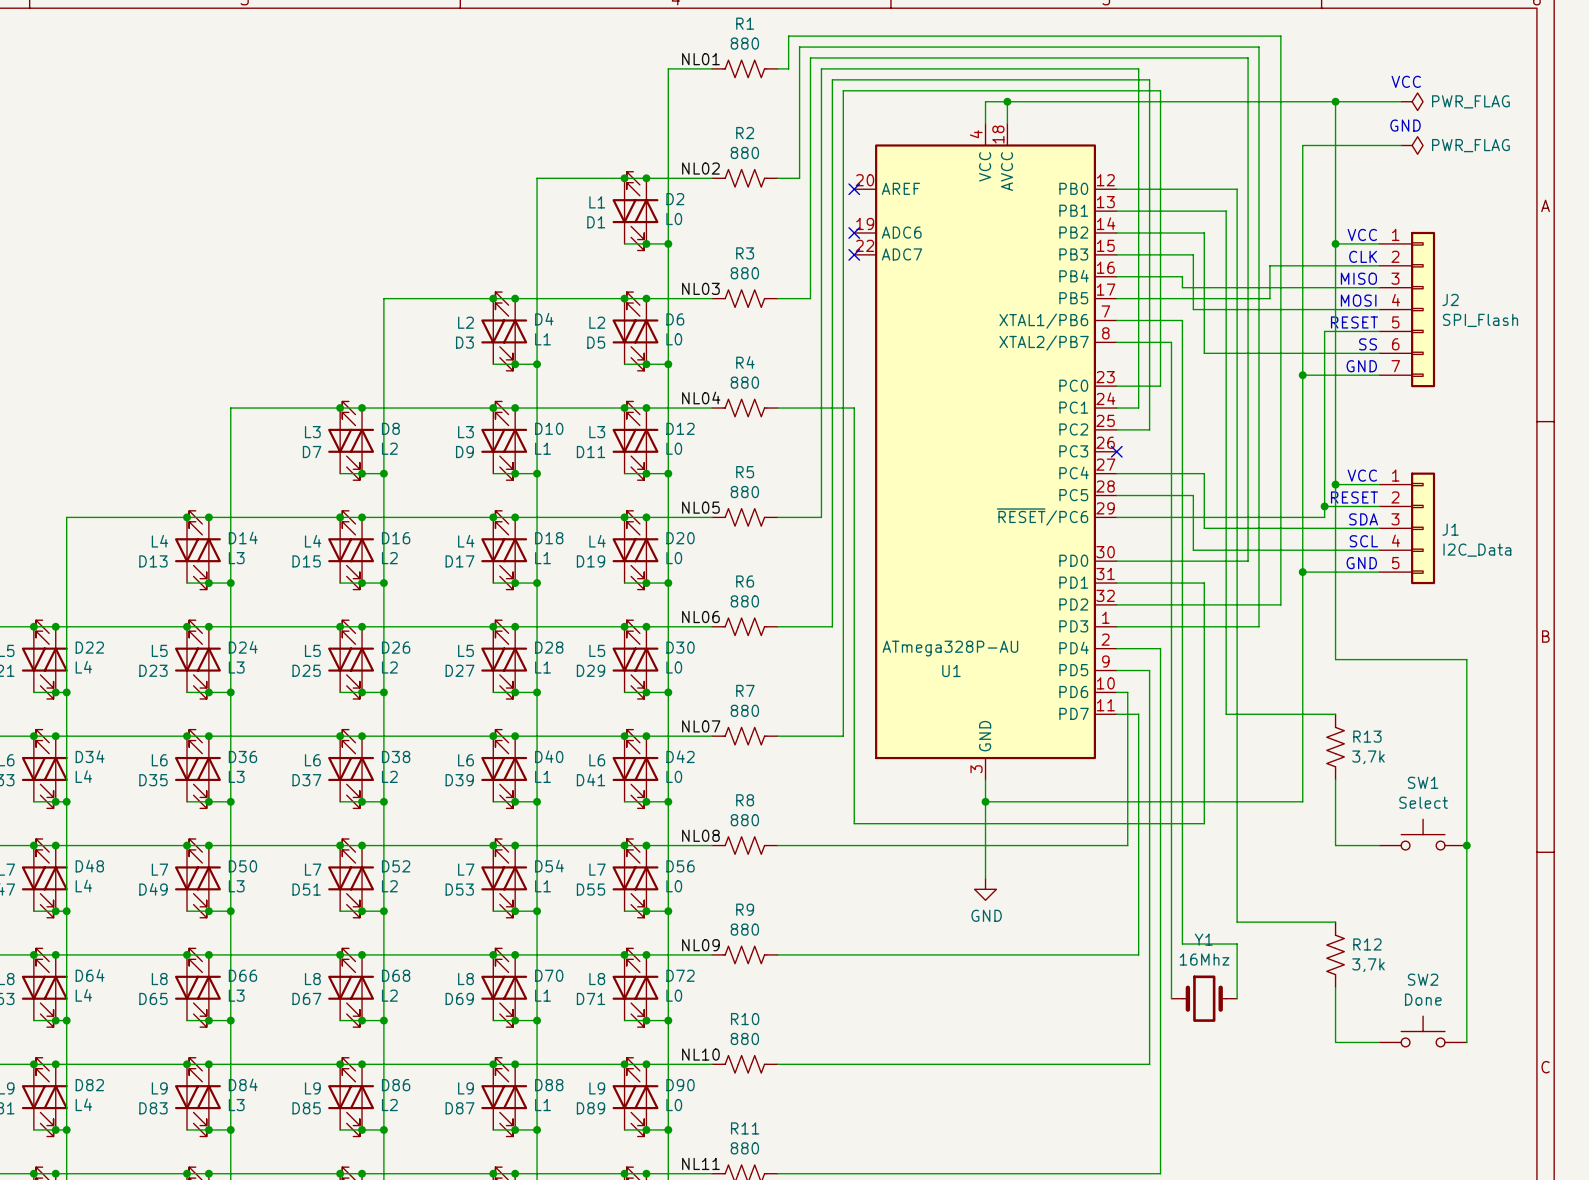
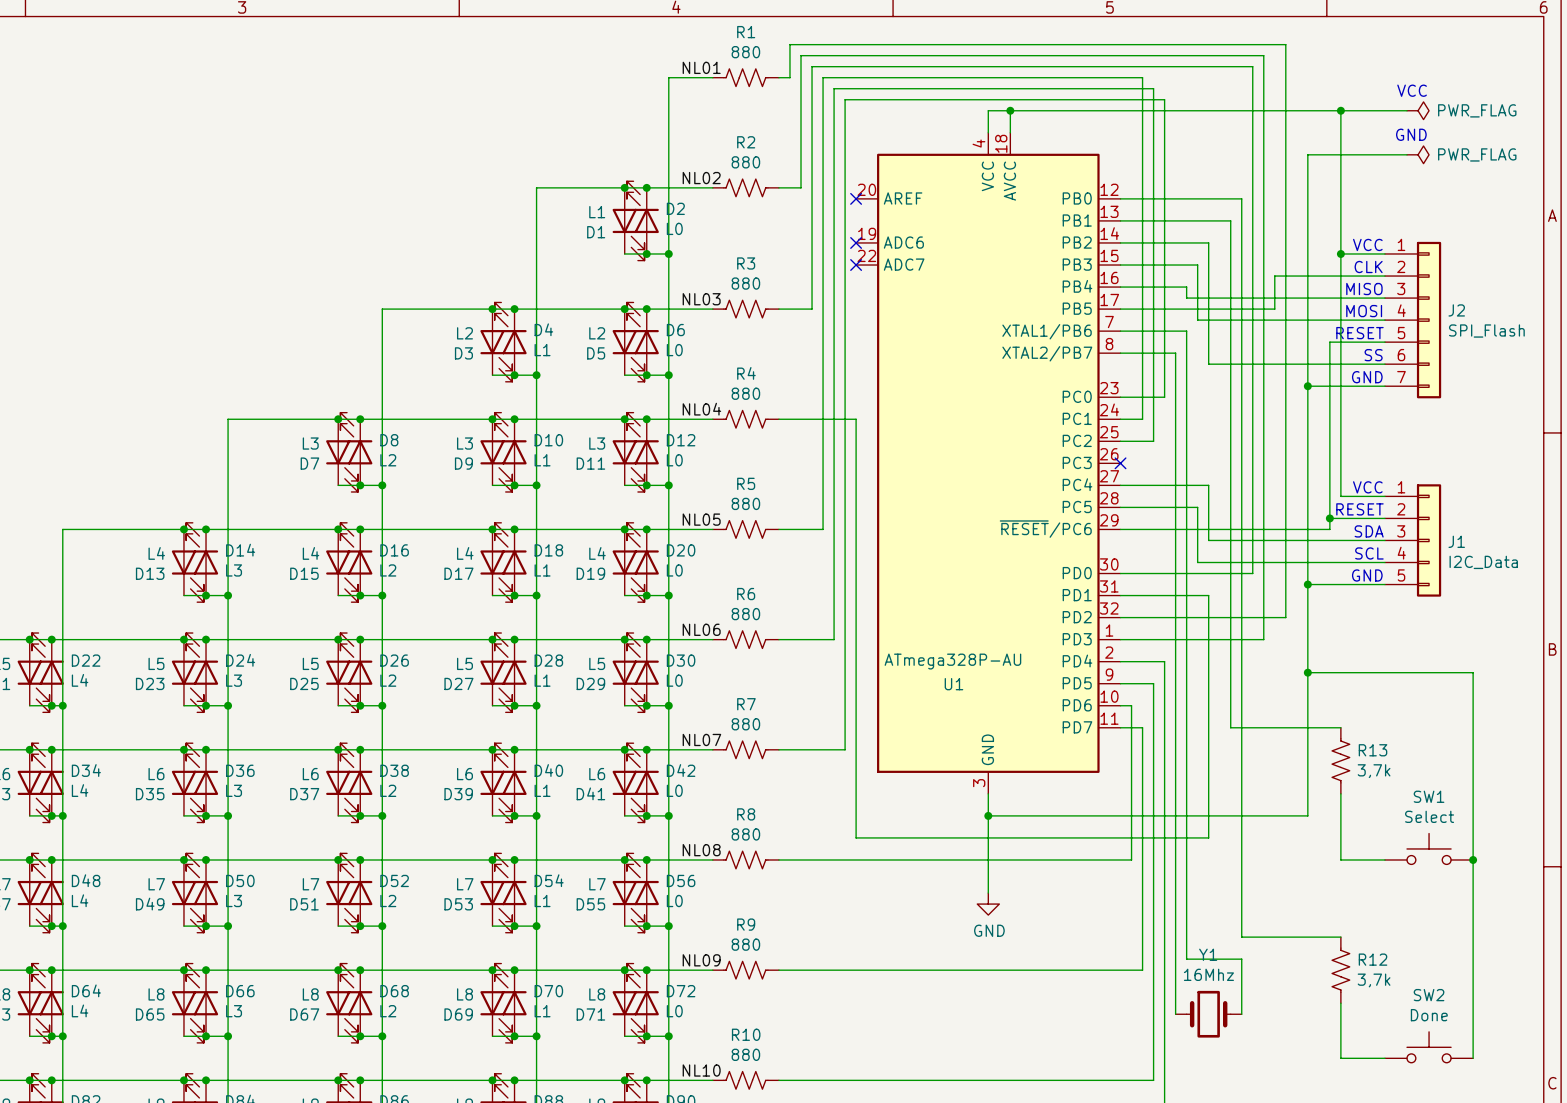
wire: (1335, 484) (1335, 659) -> (1307, 672) (1340, 672)
junction: (1335, 484) -> none
junction: none -> (1307, 672)

